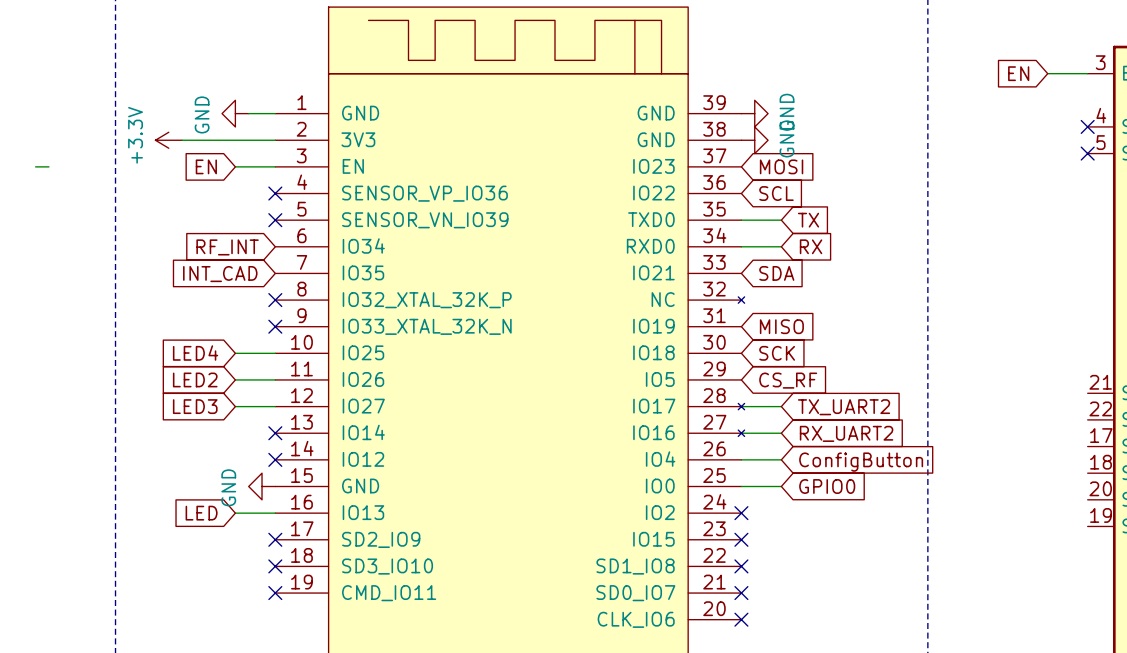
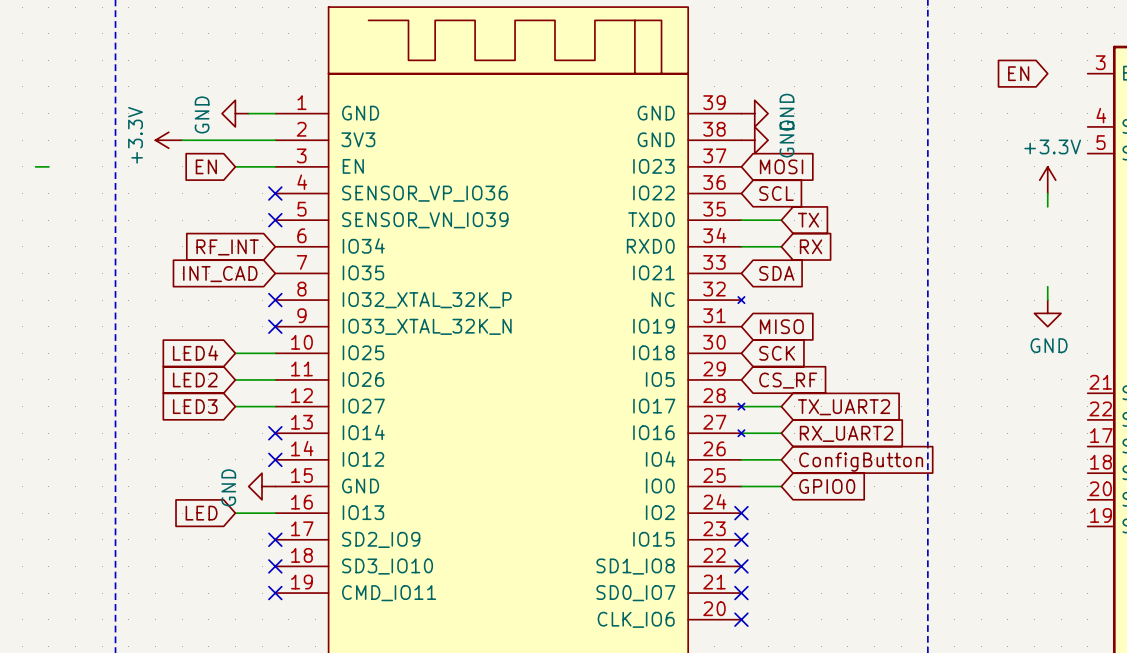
wire: (1047, 73) (1087, 73) -> none
no-connect mark: (1087, 126) -> none
no-connect mark: (1087, 153) -> none
power symbol: none -> +3.3V (1047, 180)
wire: none -> (1047, 193) (1047, 206)
wire: none -> (1047, 286) (1047, 300)
power symbol: none -> GND (1047, 313)

